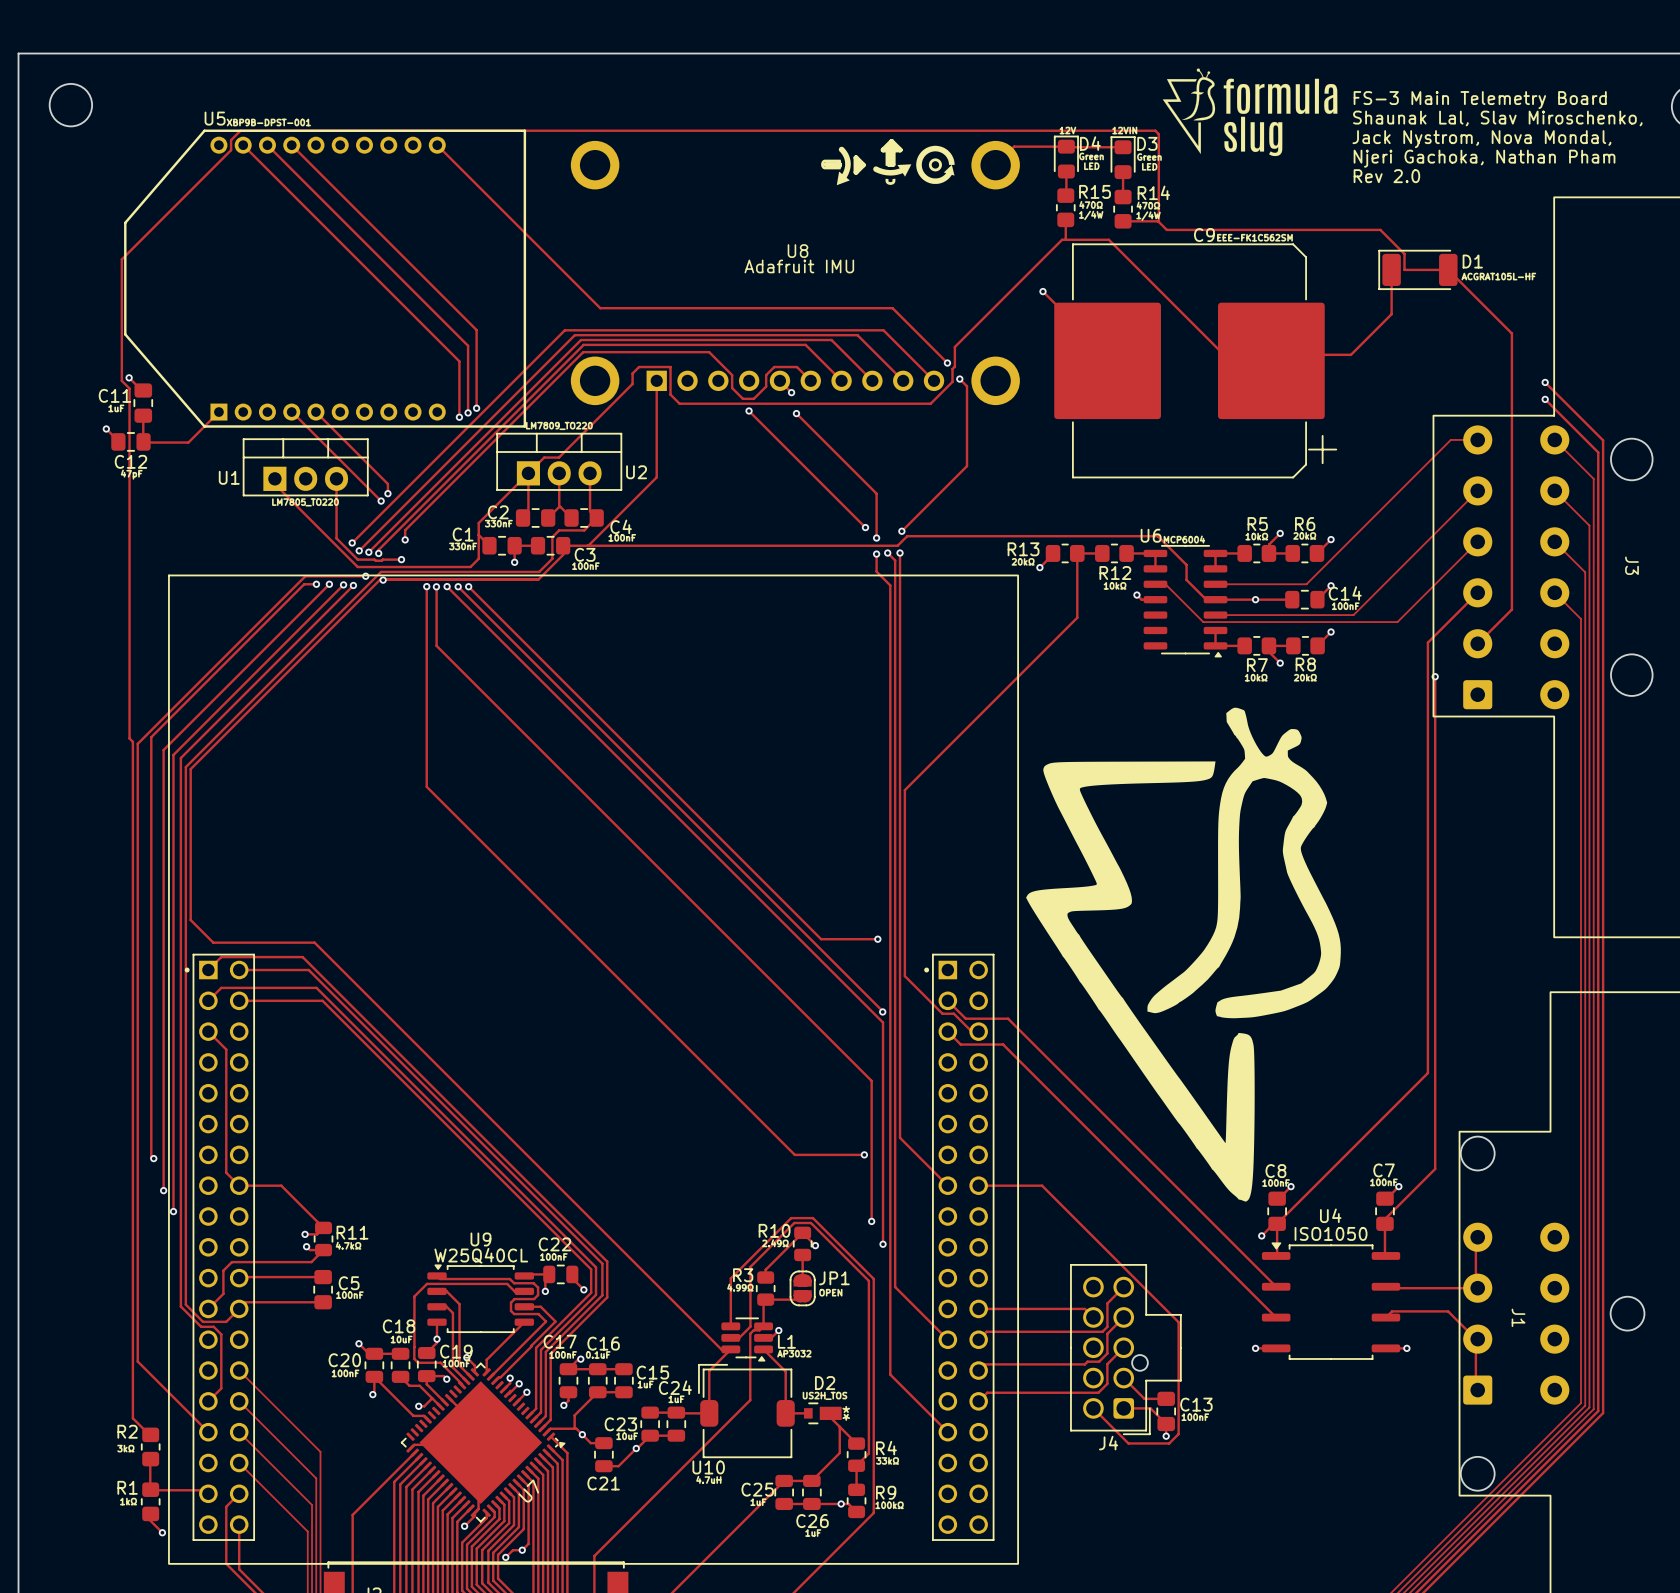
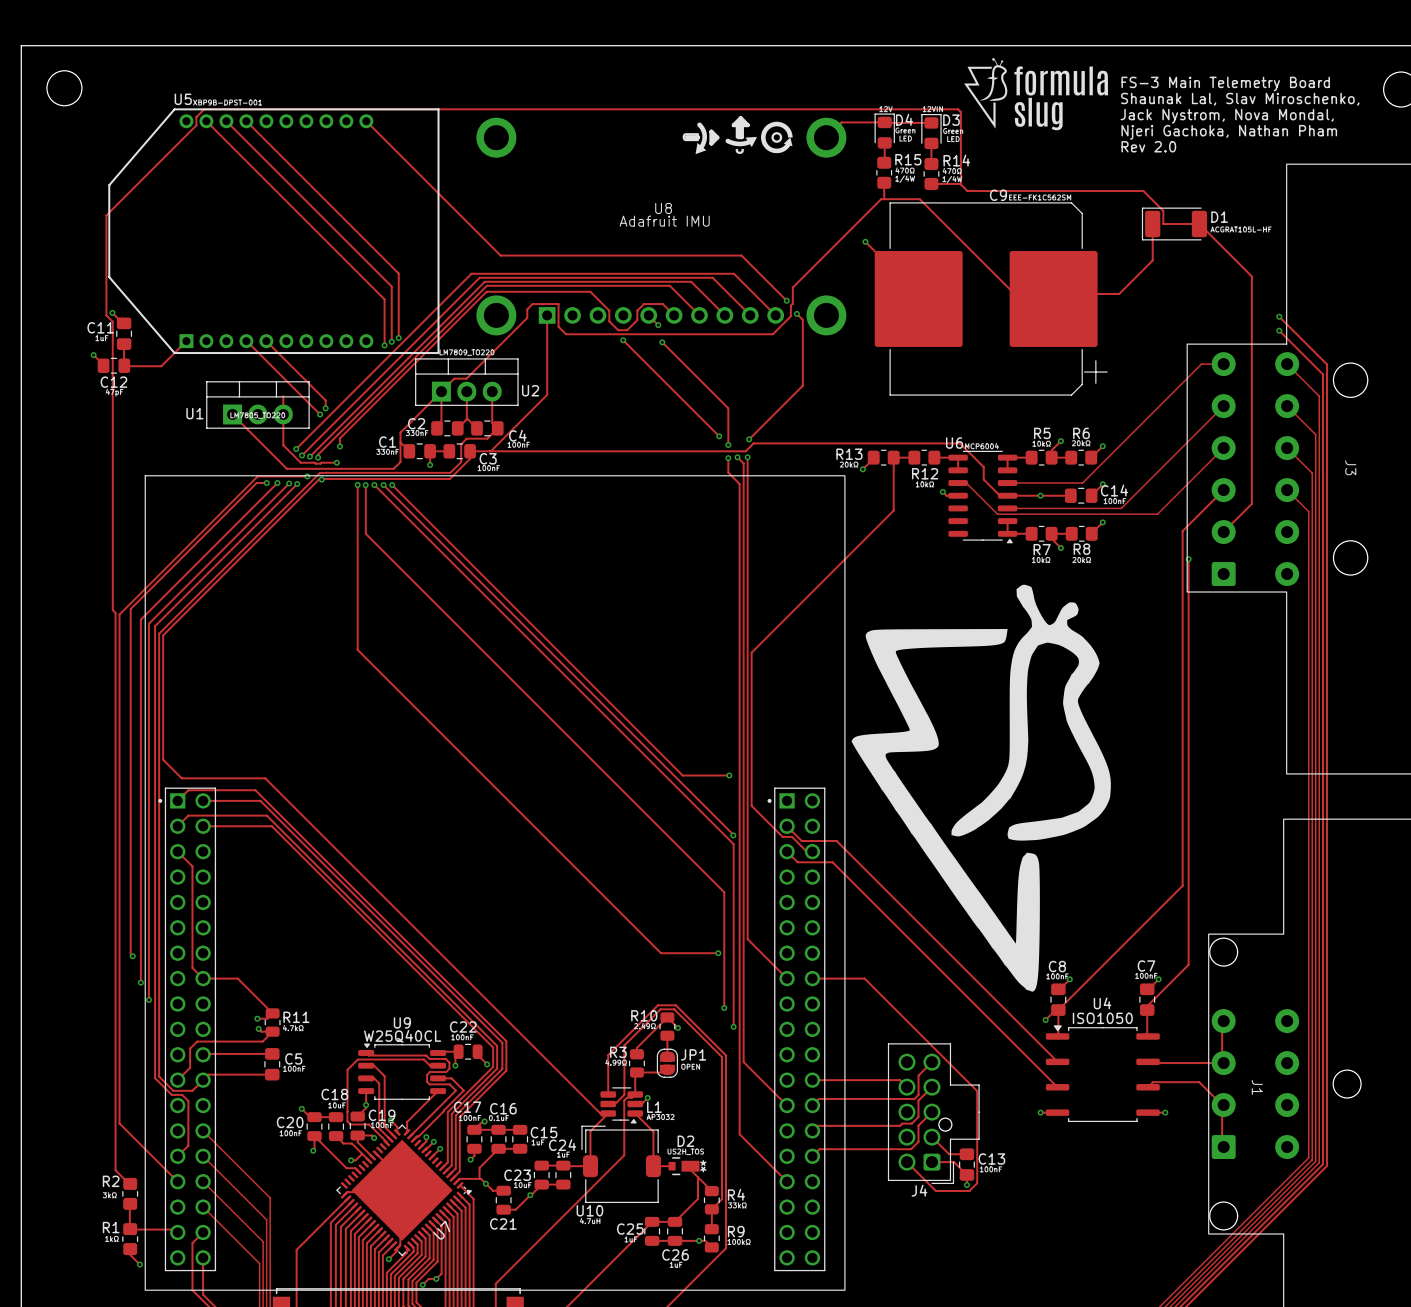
U1 position: (305, 467) -> (257, 404)
track: (274, 478) (274, 484) (357, 567) -> (232, 414) (286, 468) (300, 468)

